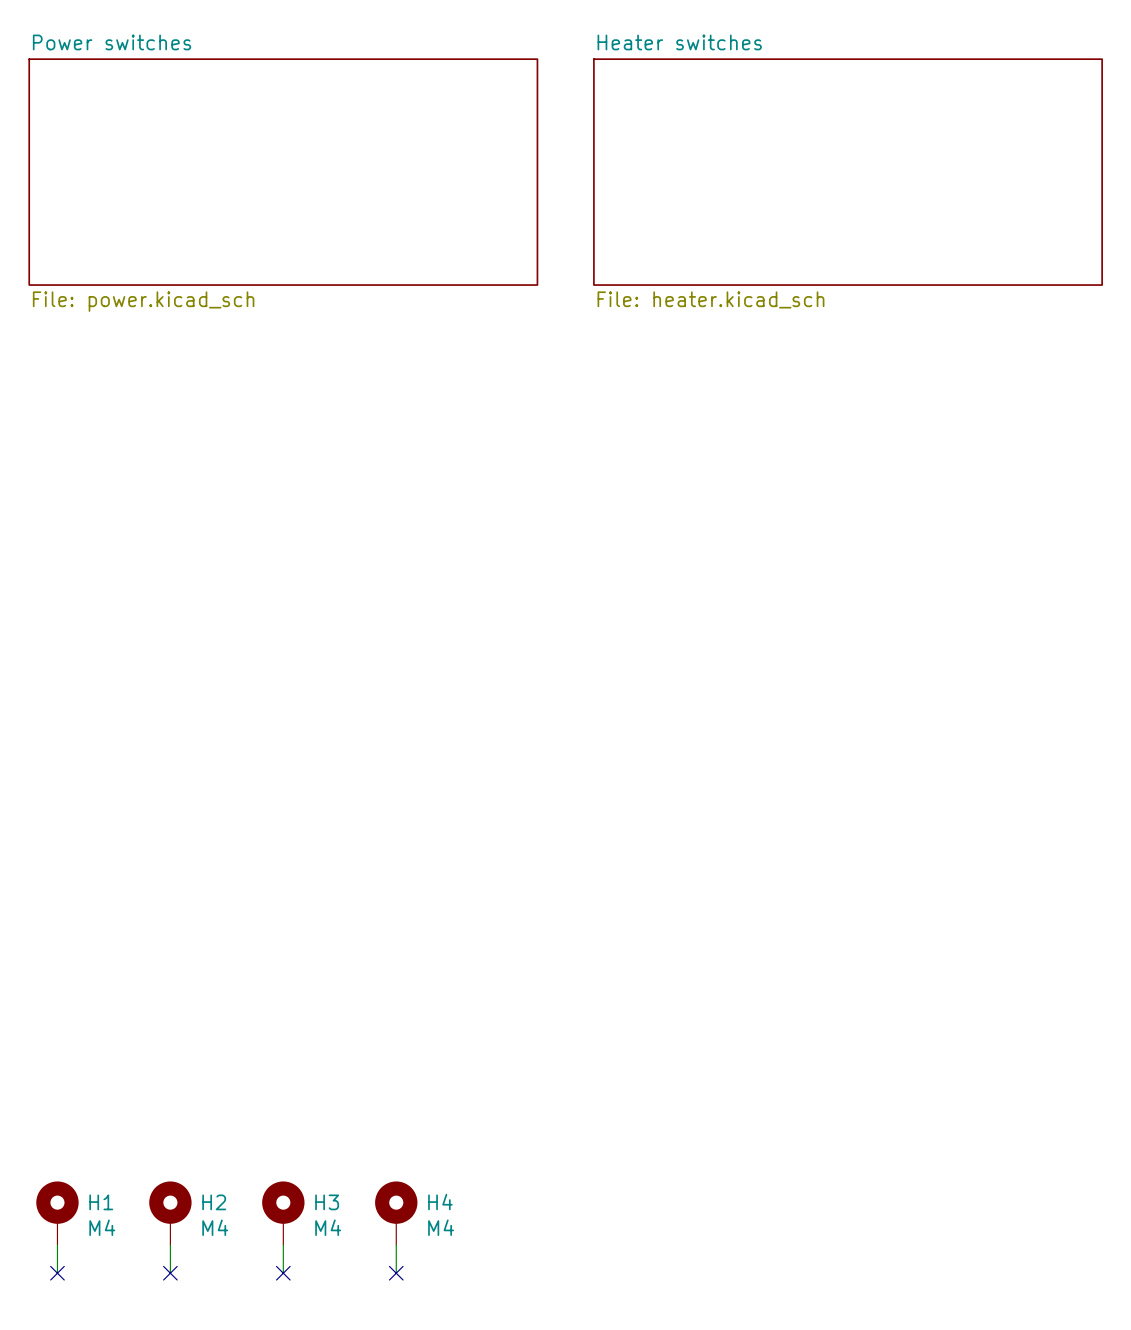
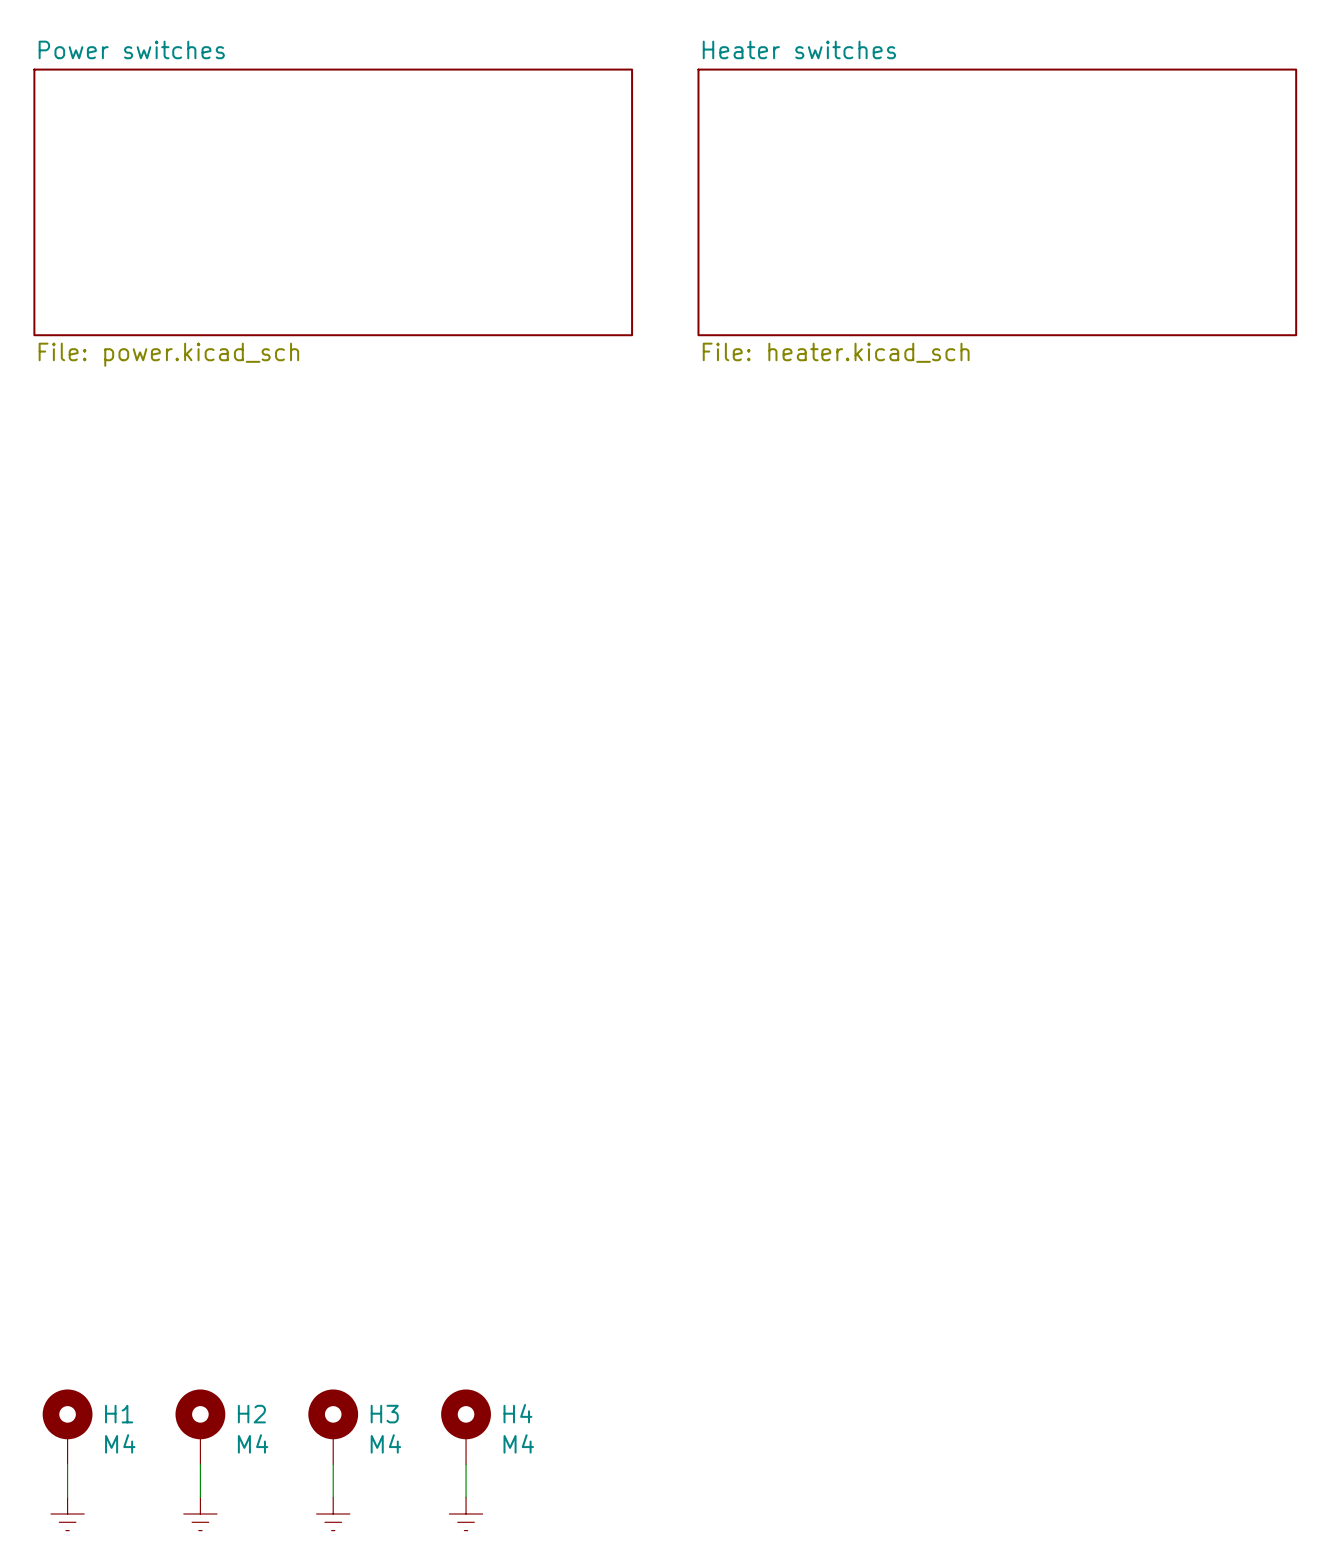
no-connect mark: (57, 1273) -> none
no-connect mark: (170, 1273) -> none
no-connect mark: (283, 1273) -> none
no-connect mark: (396, 1273) -> none
power symbol: none -> (67, 1513)
power symbol: none -> (200, 1513)
power symbol: none -> (333, 1513)
power symbol: none -> (466, 1513)

